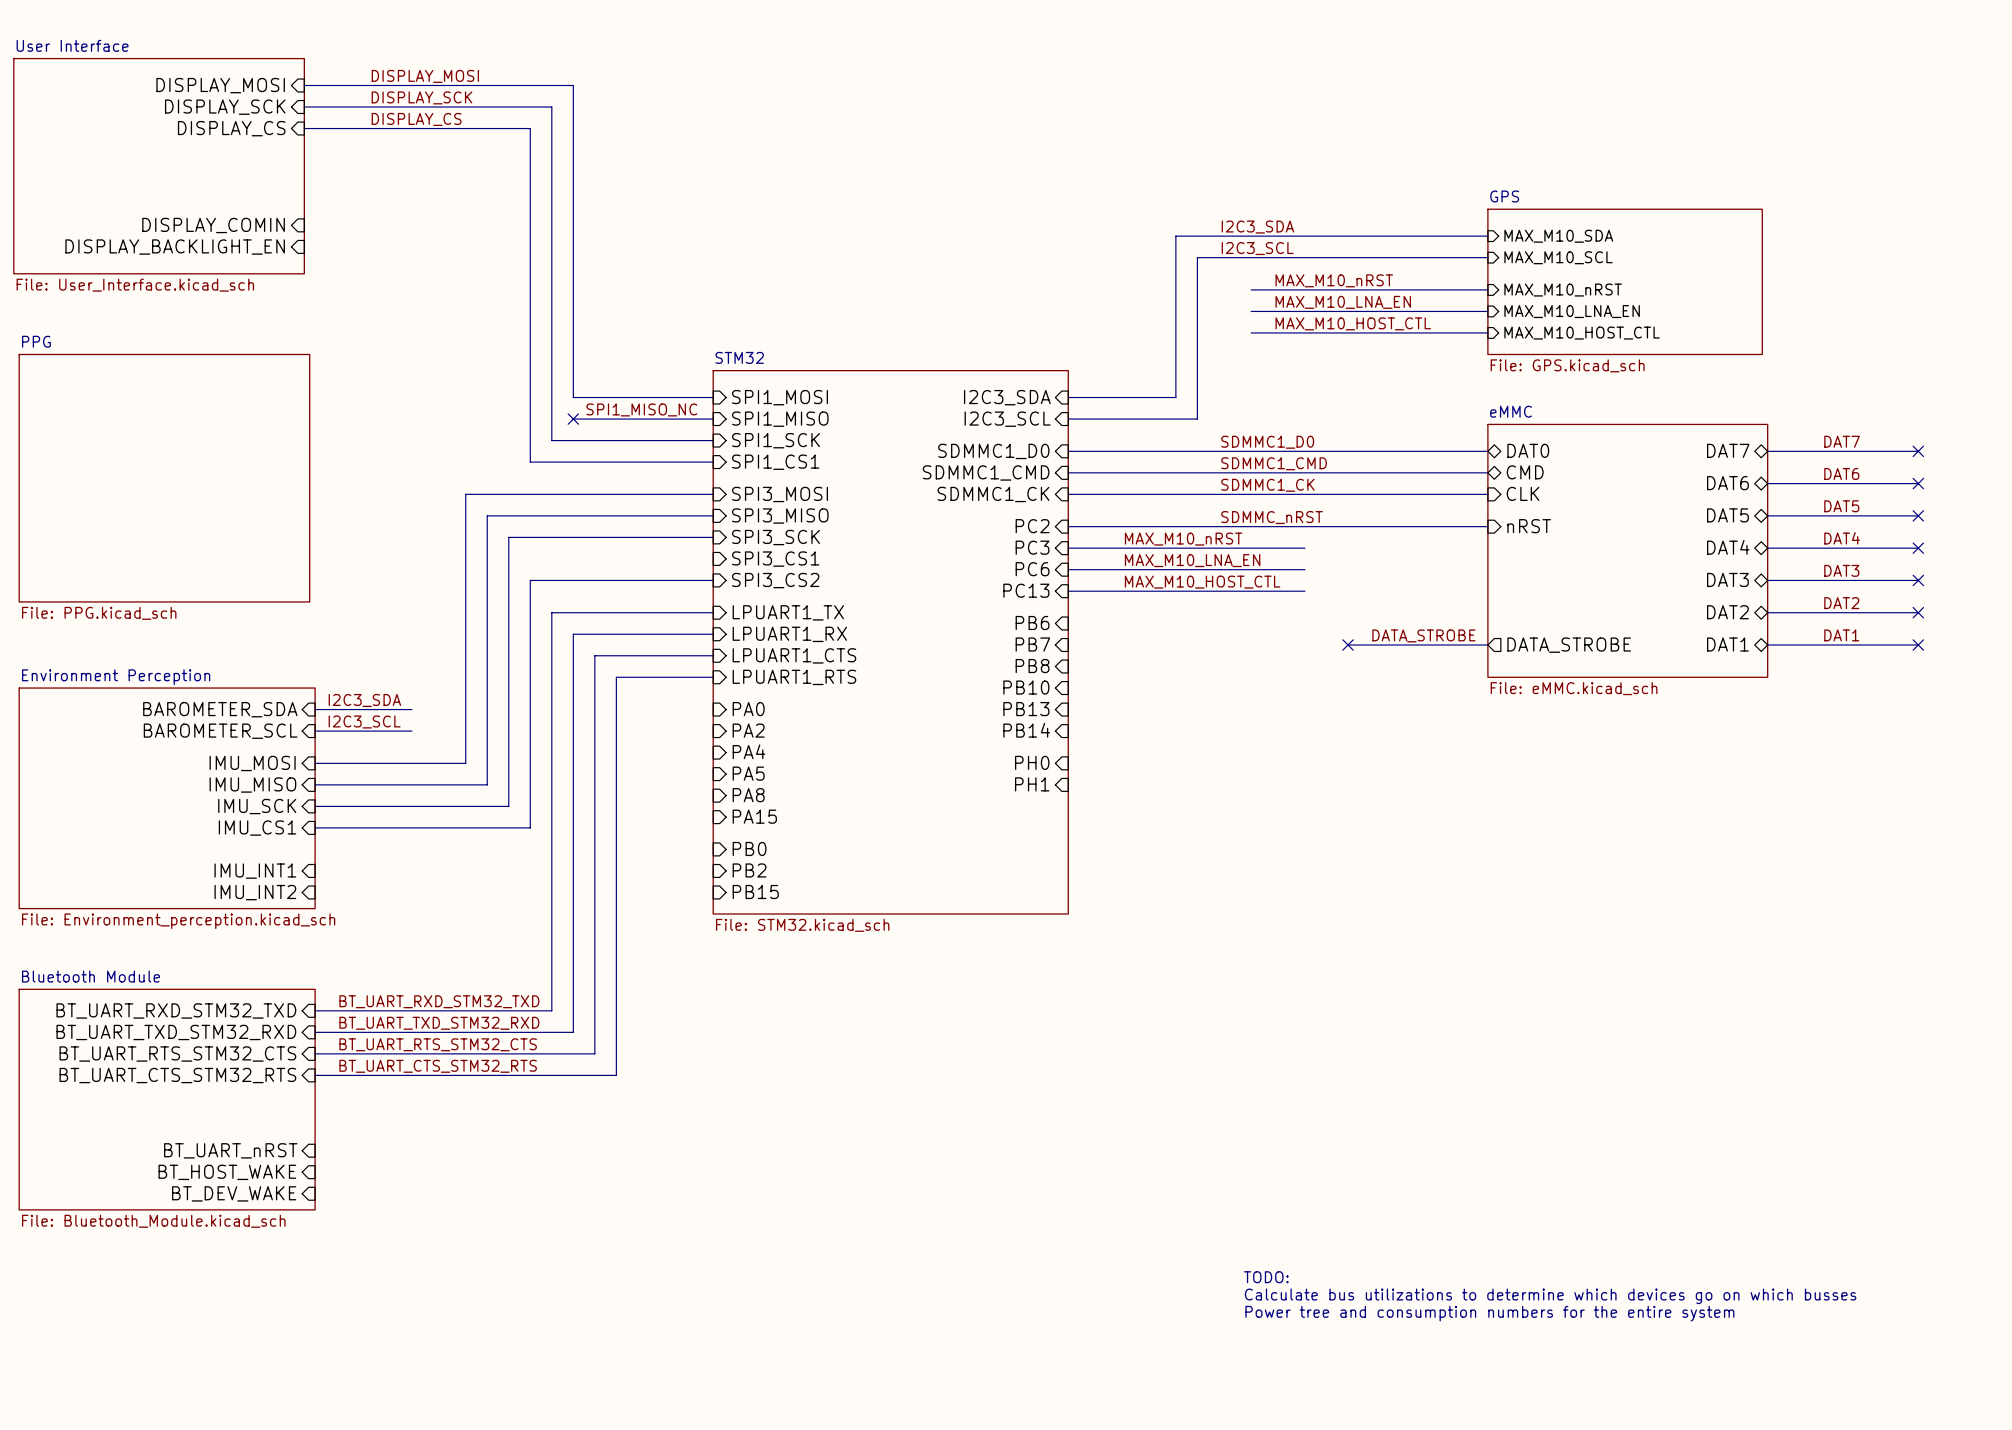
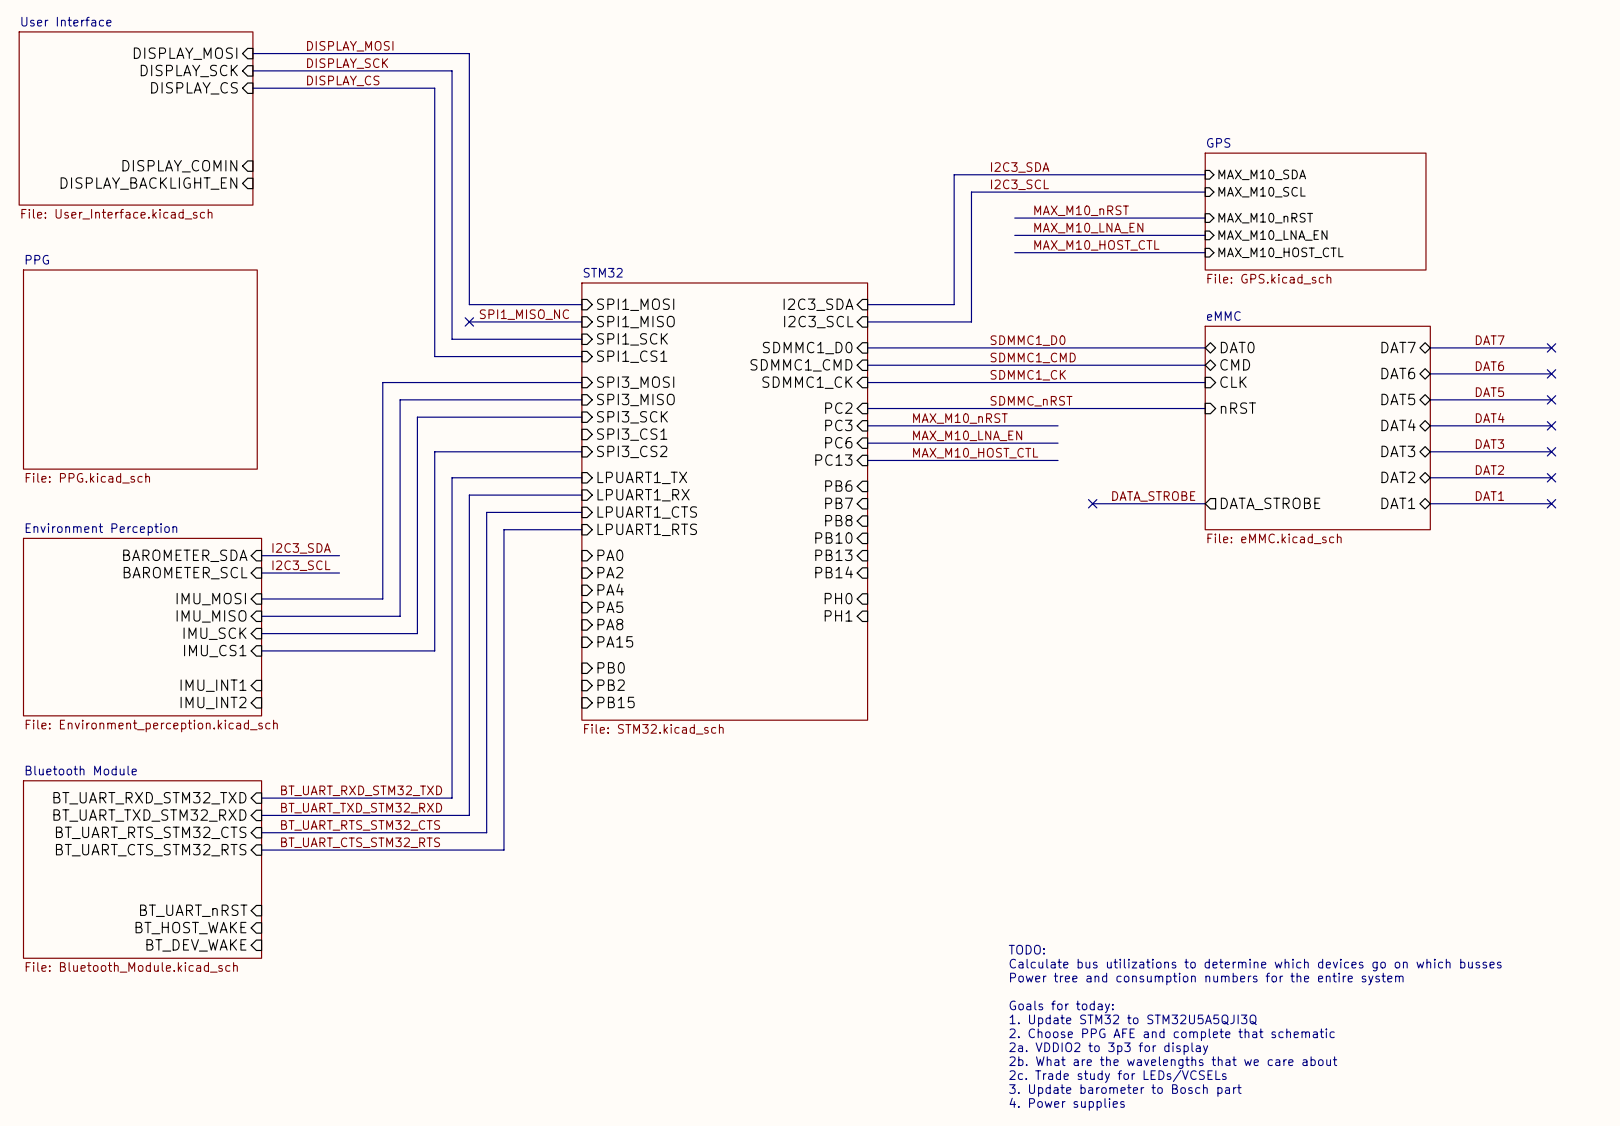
text: none -> Goals for today: (1061, 1006)
text position: TODO: (1266, 1277) -> TODO: (1026, 949)
text: none -> 1. Update STM32 to STM32U5A5QJI3Q (1133, 1020)
text position: Calculate bus utilizations to determine which devices go on which busses (1550, 1296) -> Calculate bus utilizations to determine which devices go on which busses (1255, 965)
text: none -> 2. Choose PPG AFE and complete that schematic (1171, 1034)
text position: Power tree and consumption numbers for the entire system (1489, 1313) -> Power tree and consumption numbers for the entire system (1206, 979)
text: none -> 2a. VDDIO2 to 3p3 for display (1108, 1048)
text: none -> 2b. What are the wavelengths that we care about (1173, 1062)
text: none -> 2c. Trade study for LEDs/VCSELs (1117, 1076)
text: none -> 3. Update barometer to Bosch part (1125, 1090)
text: none -> 4. Power supplies (1067, 1104)

